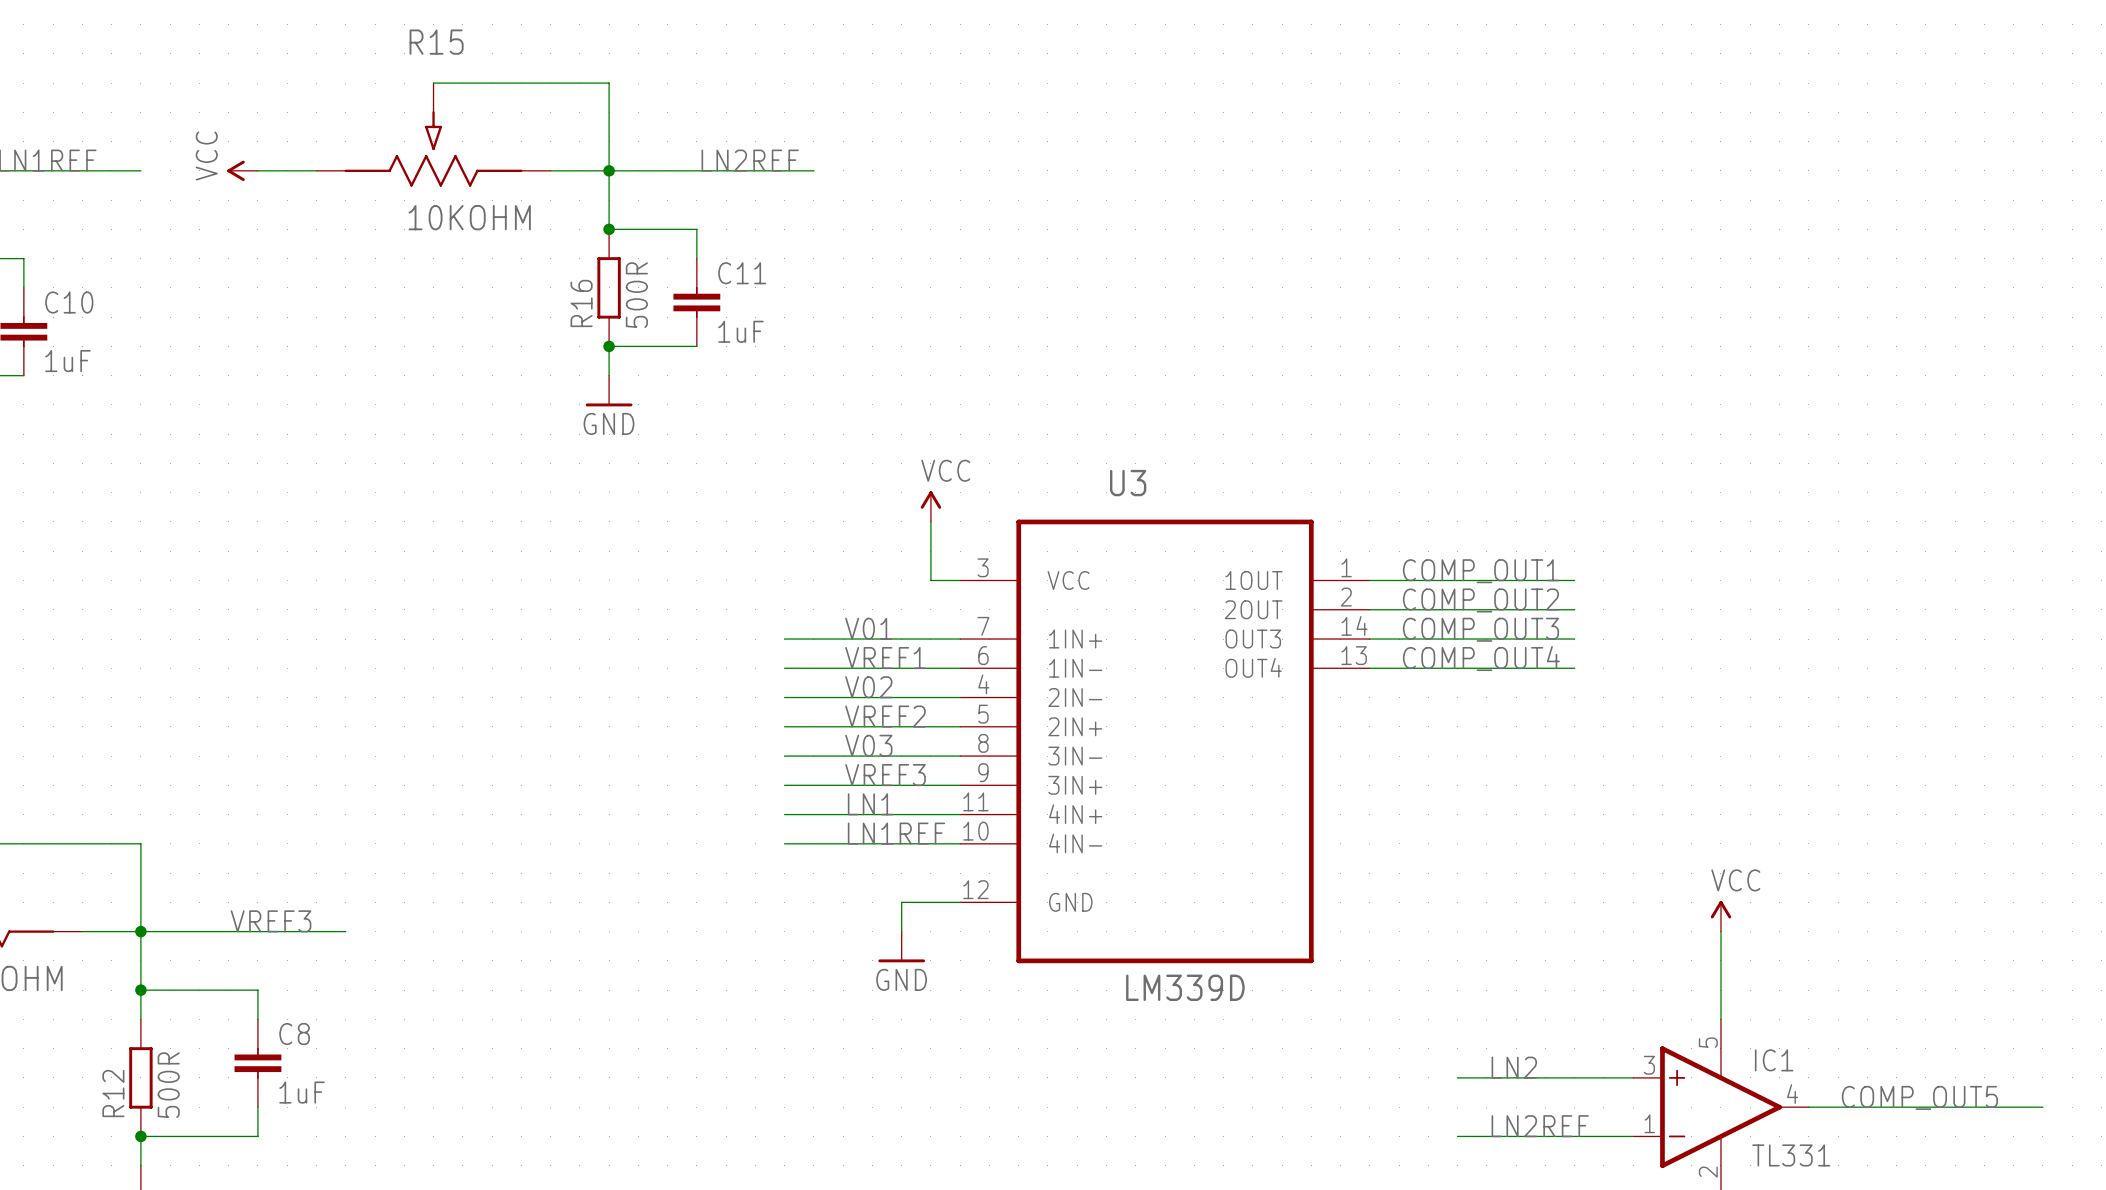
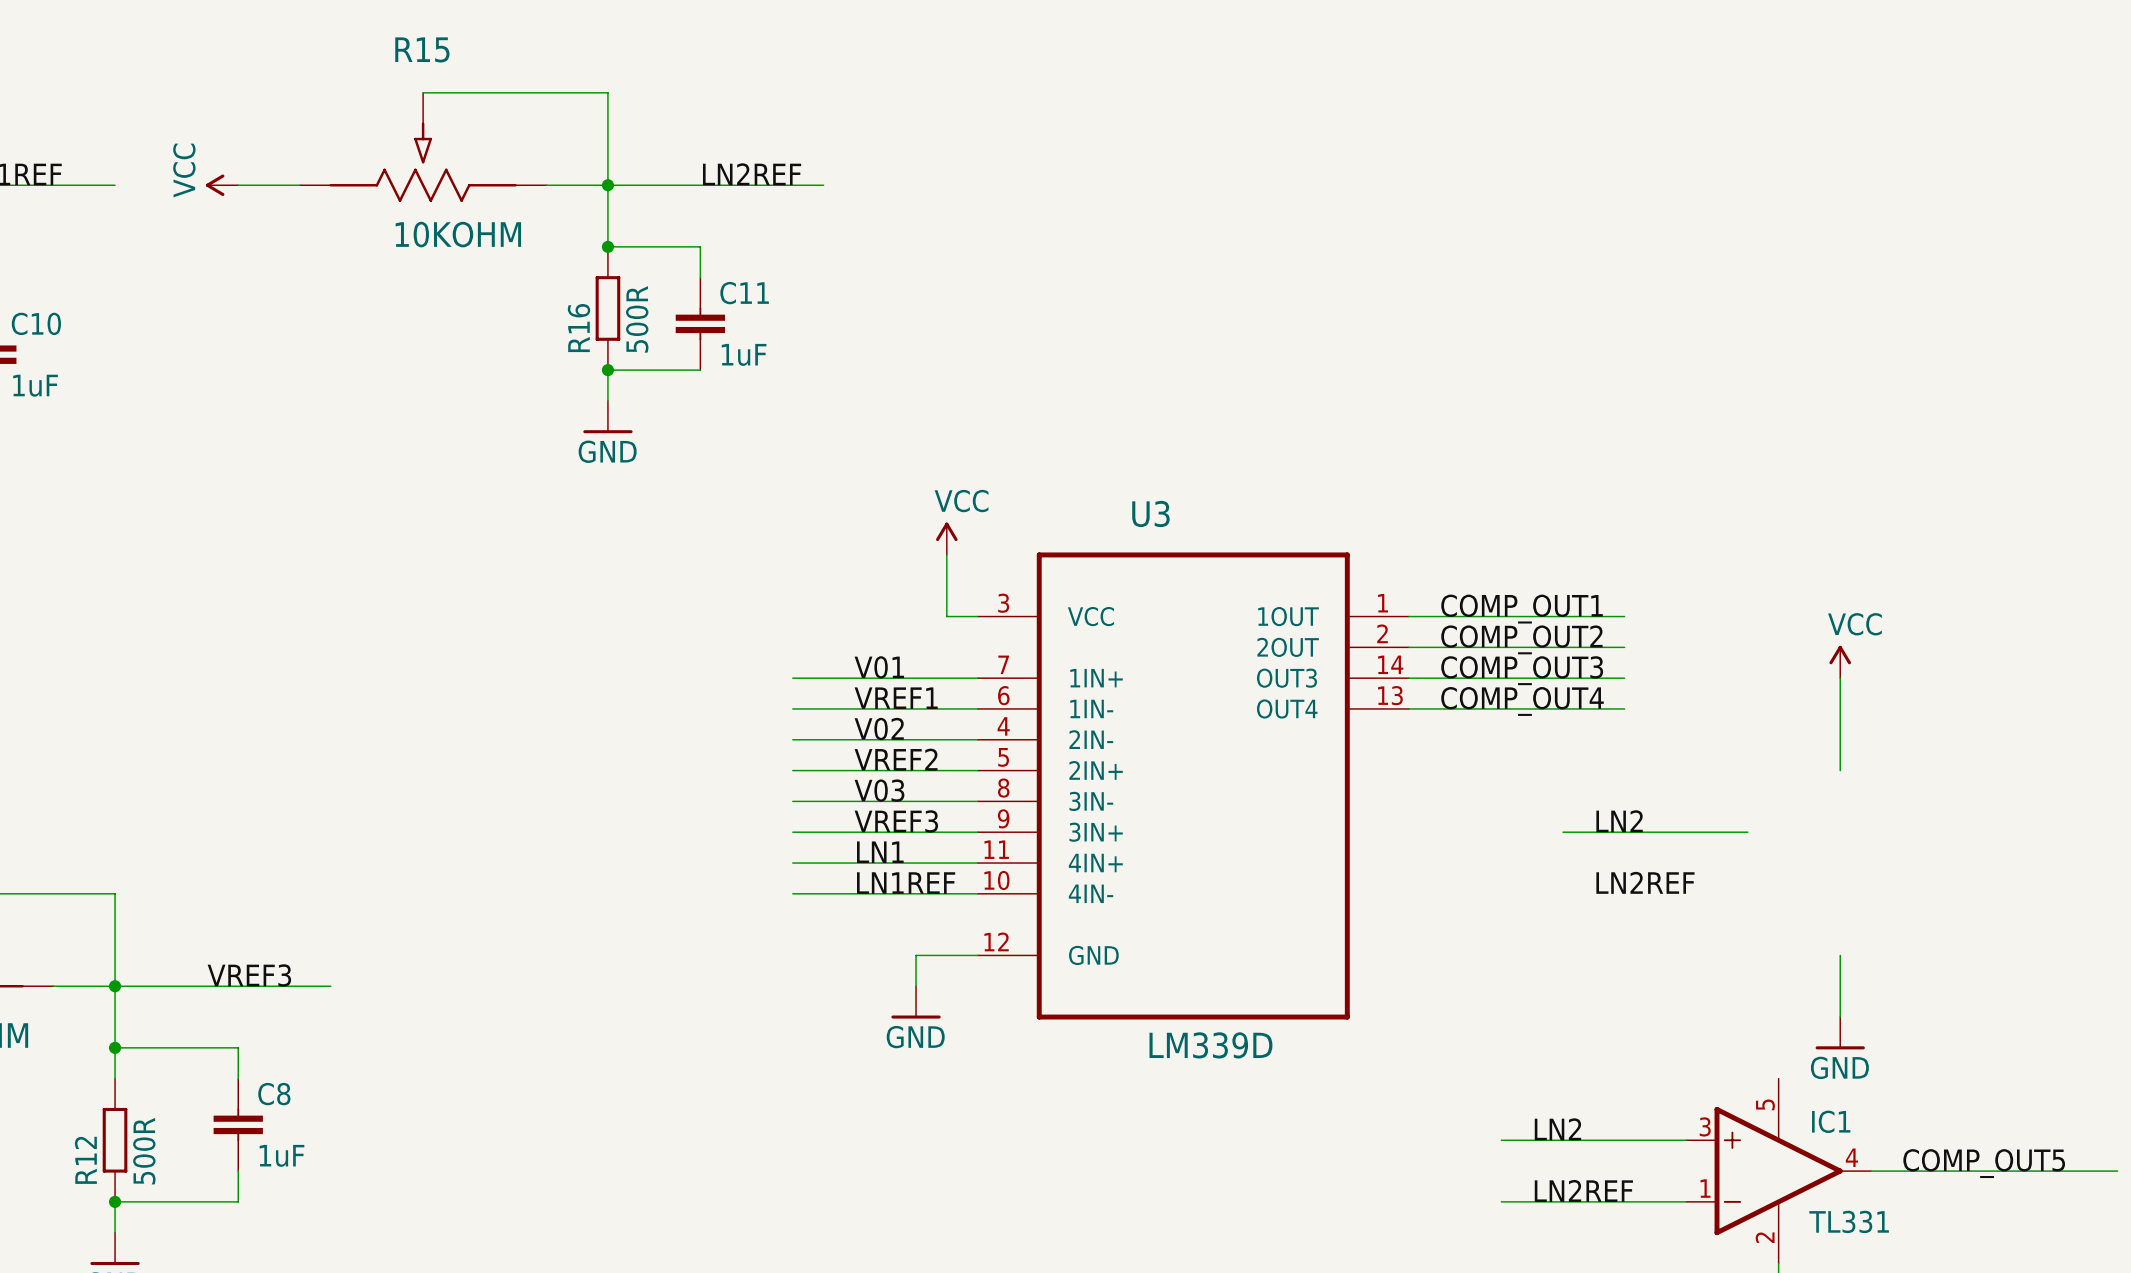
power symbol: none -> VCC (1840, 661)
wire: none -> (1840, 678) (1840, 770)
label: none -> LN2 (1619, 821)
wire: none -> (1562, 832) (1747, 832)
label: none -> LN2REF (1645, 882)
wire: none -> (1840, 955) (1840, 1017)
power symbol: VCC (1720, 916) -> none
wire: (1720, 931) (1720, 1019) -> none
power symbol: none -> GND (1840, 1033)

